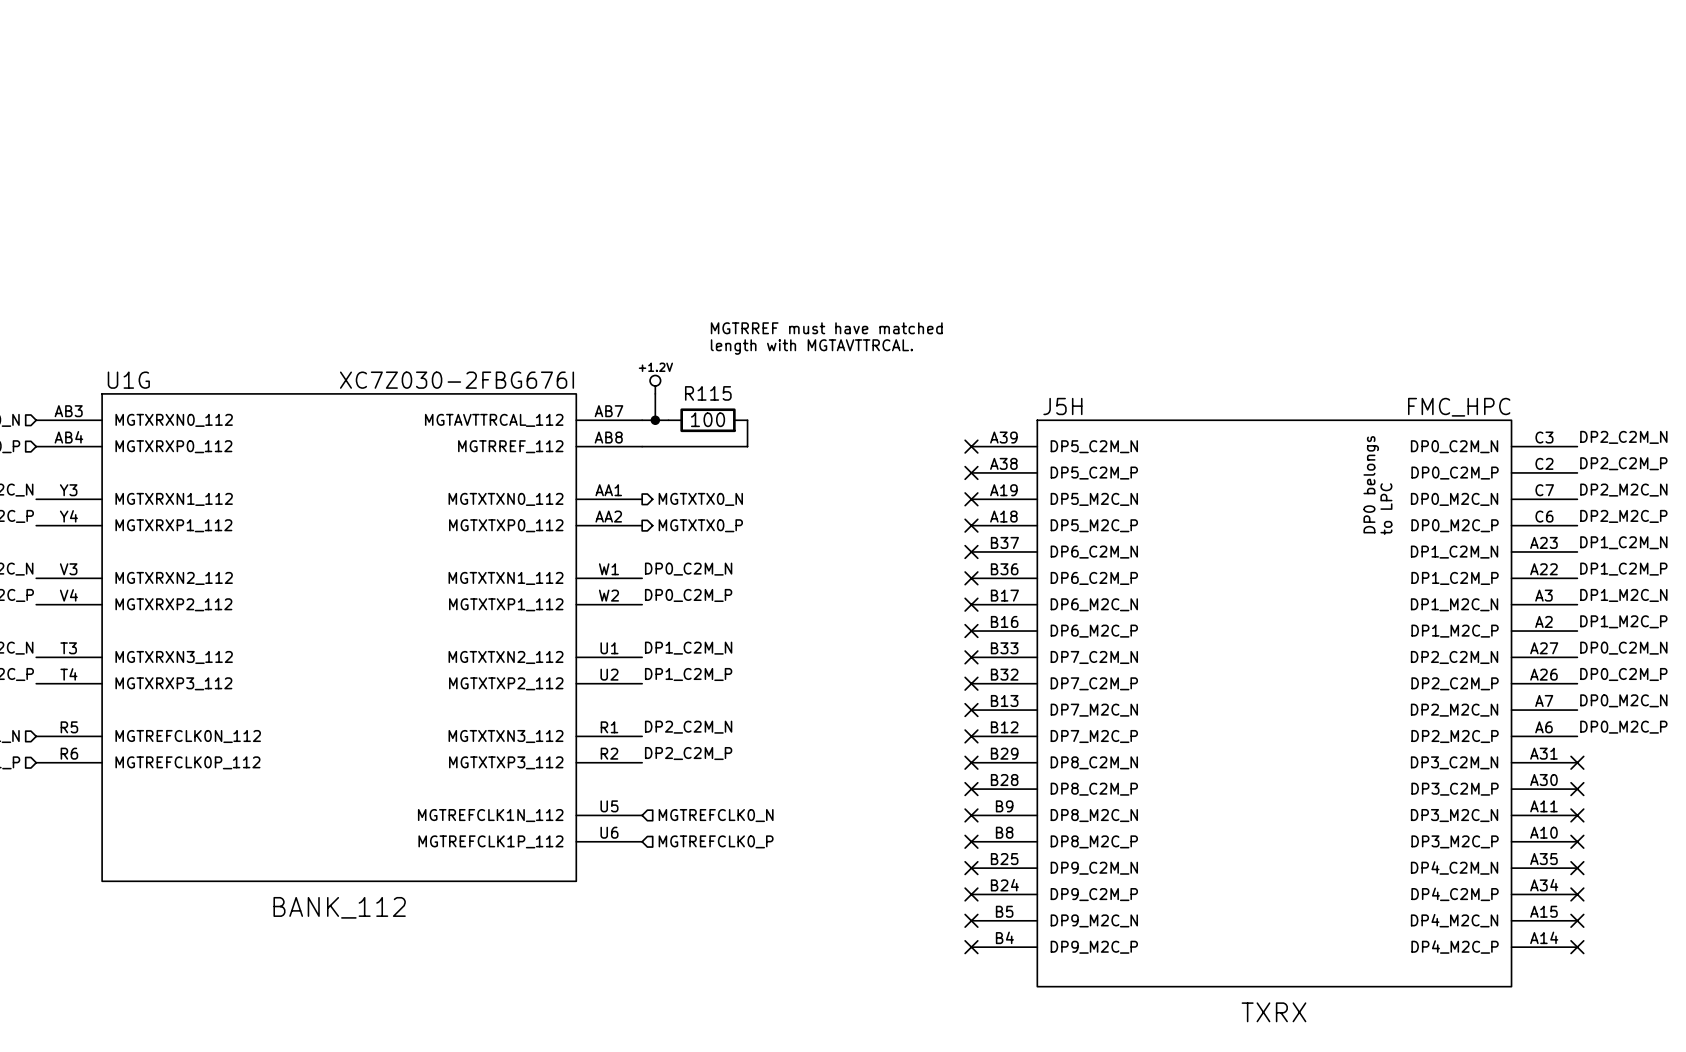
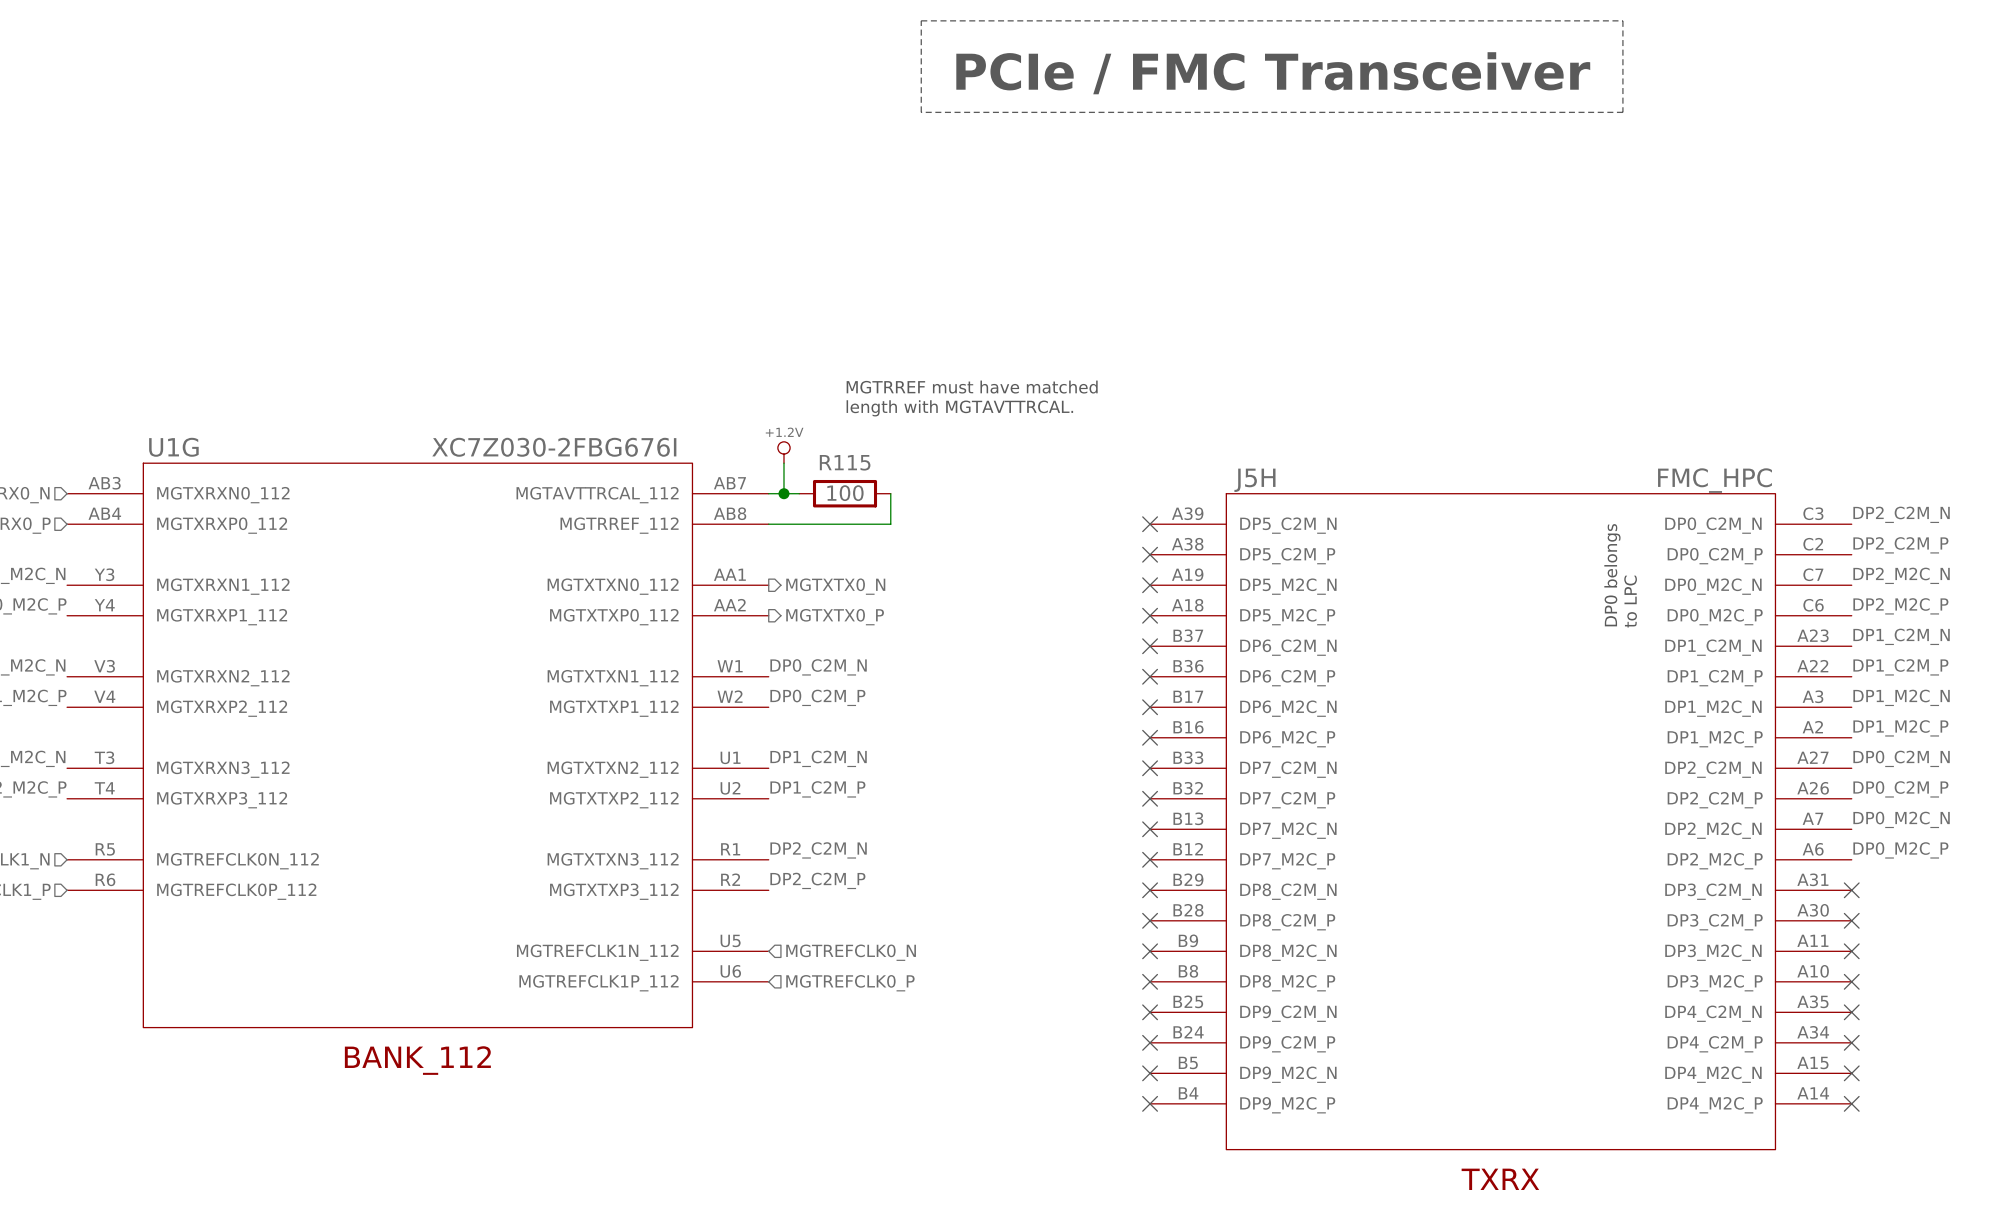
line: none -> (921, 20) (1622, 20) (1622, 112) (921, 112) (921, 20)
text: none -> PCIe / FMC Transceiver (1273, 73)

